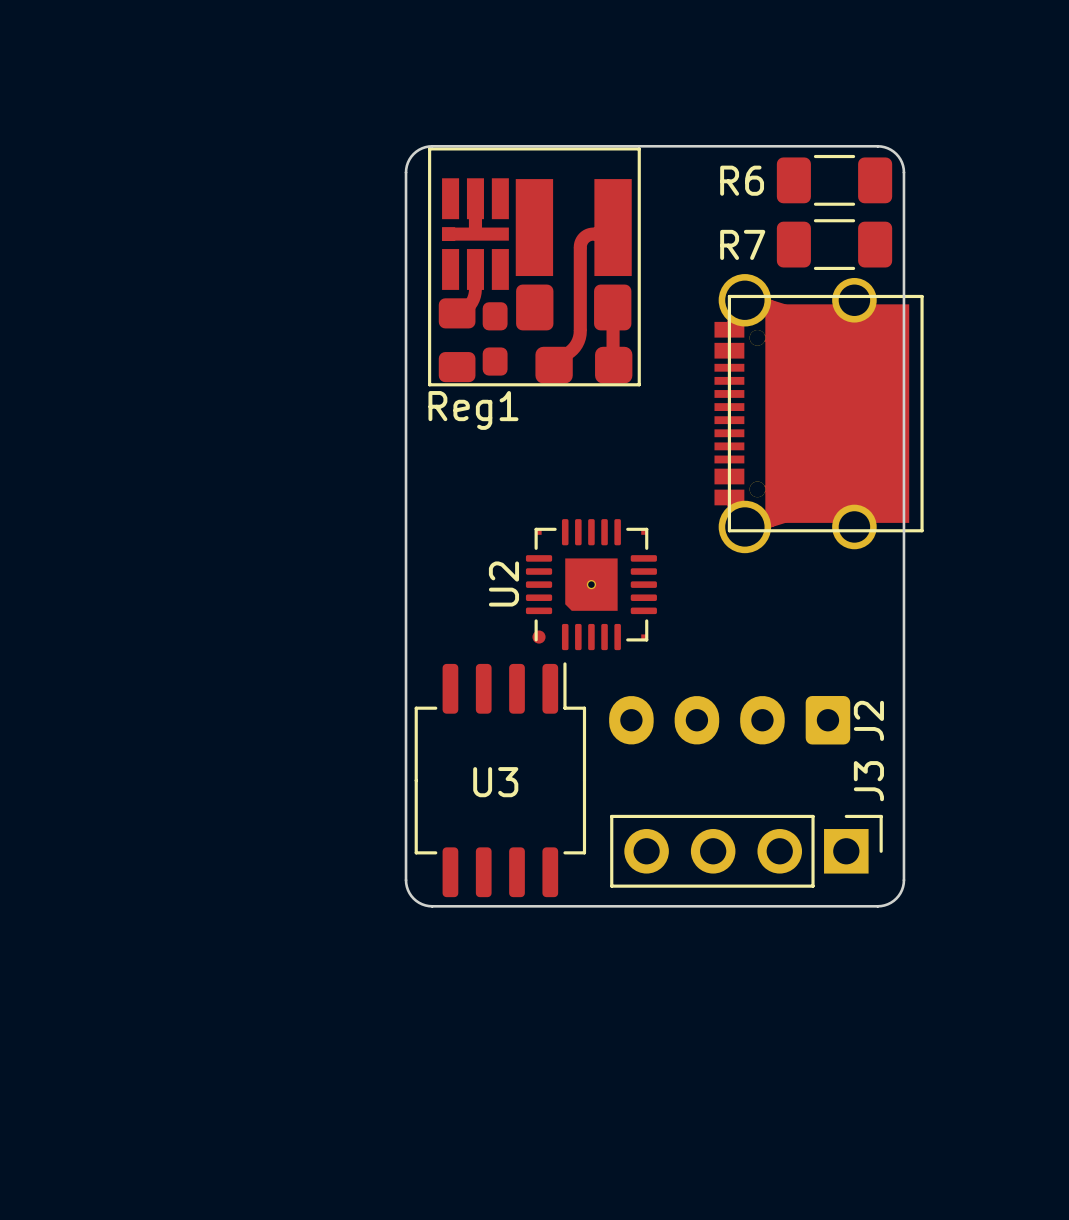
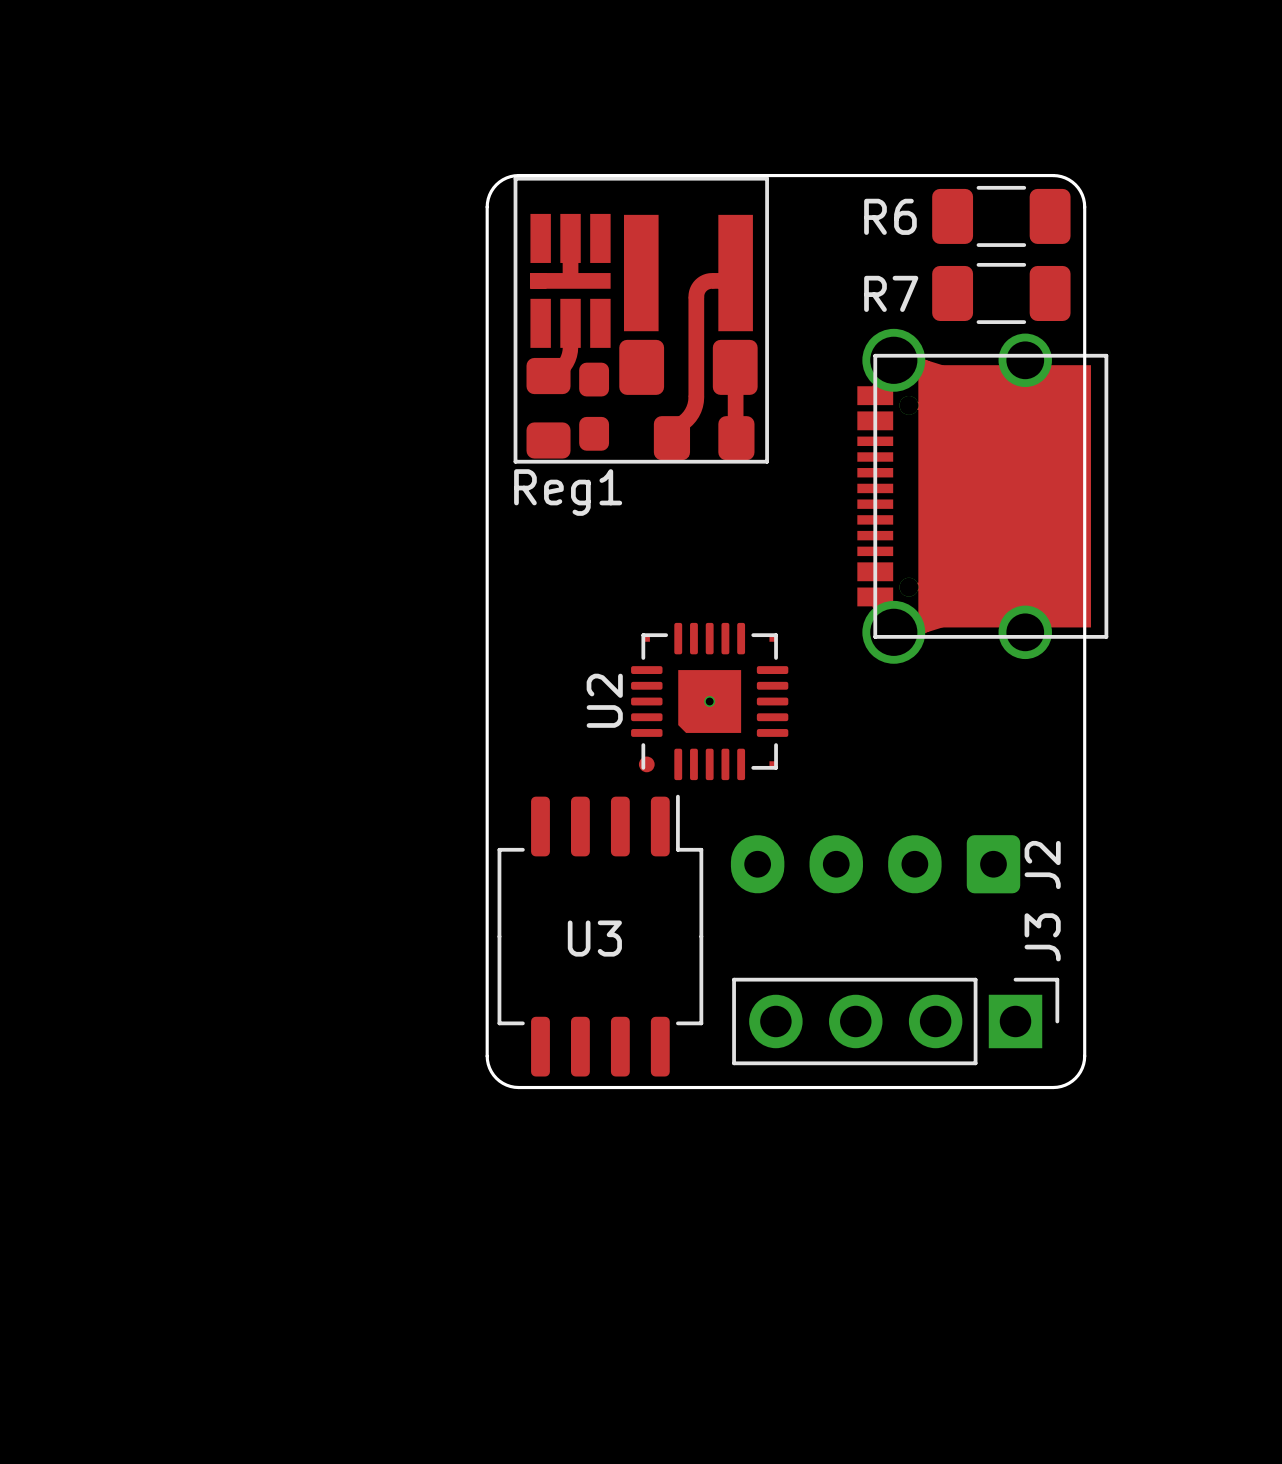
Reg1 footprint: [428, 147, 641, 387] -> [513, 176, 769, 464]

